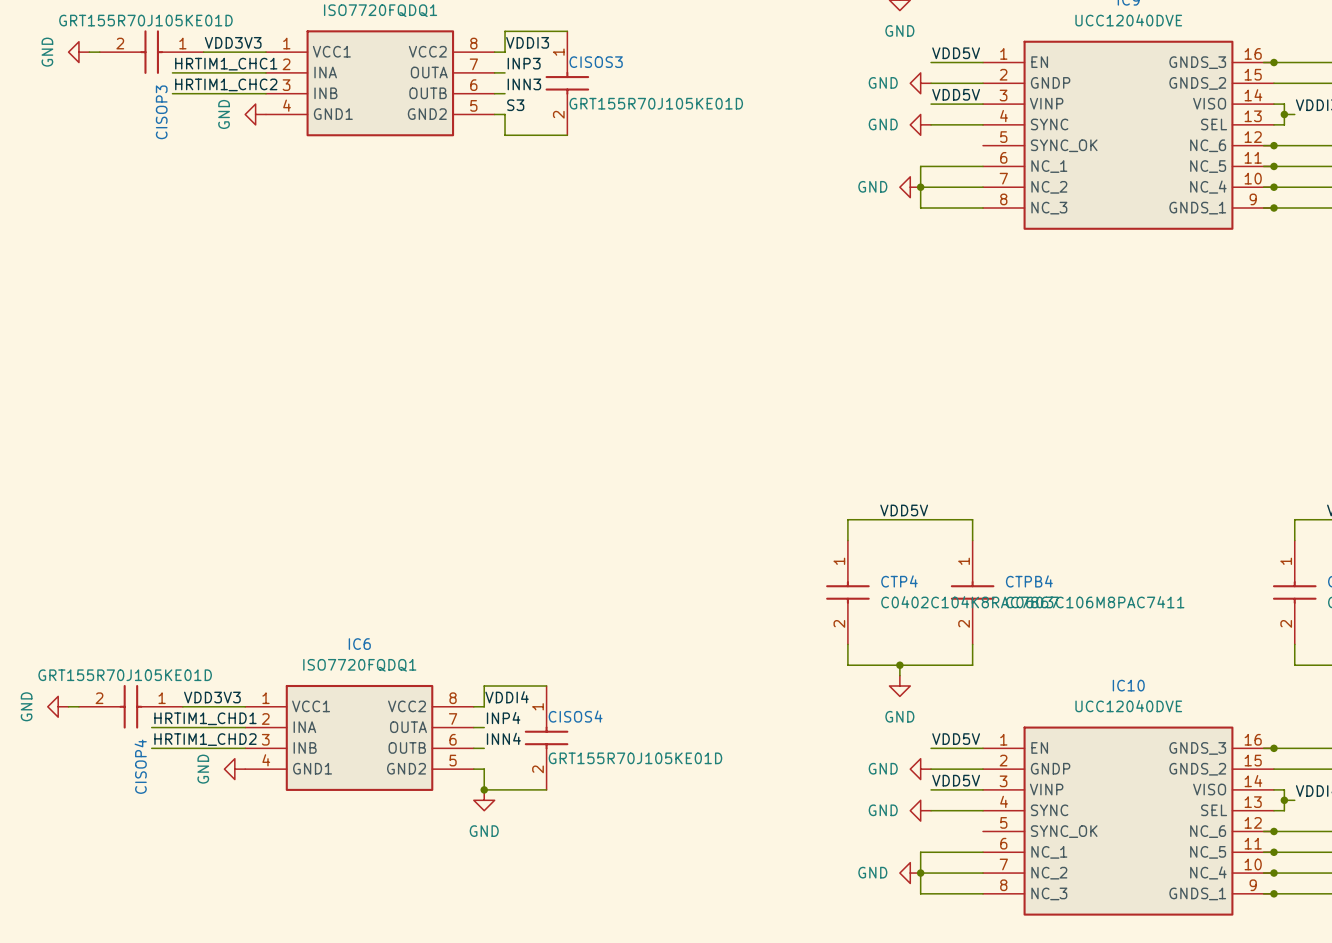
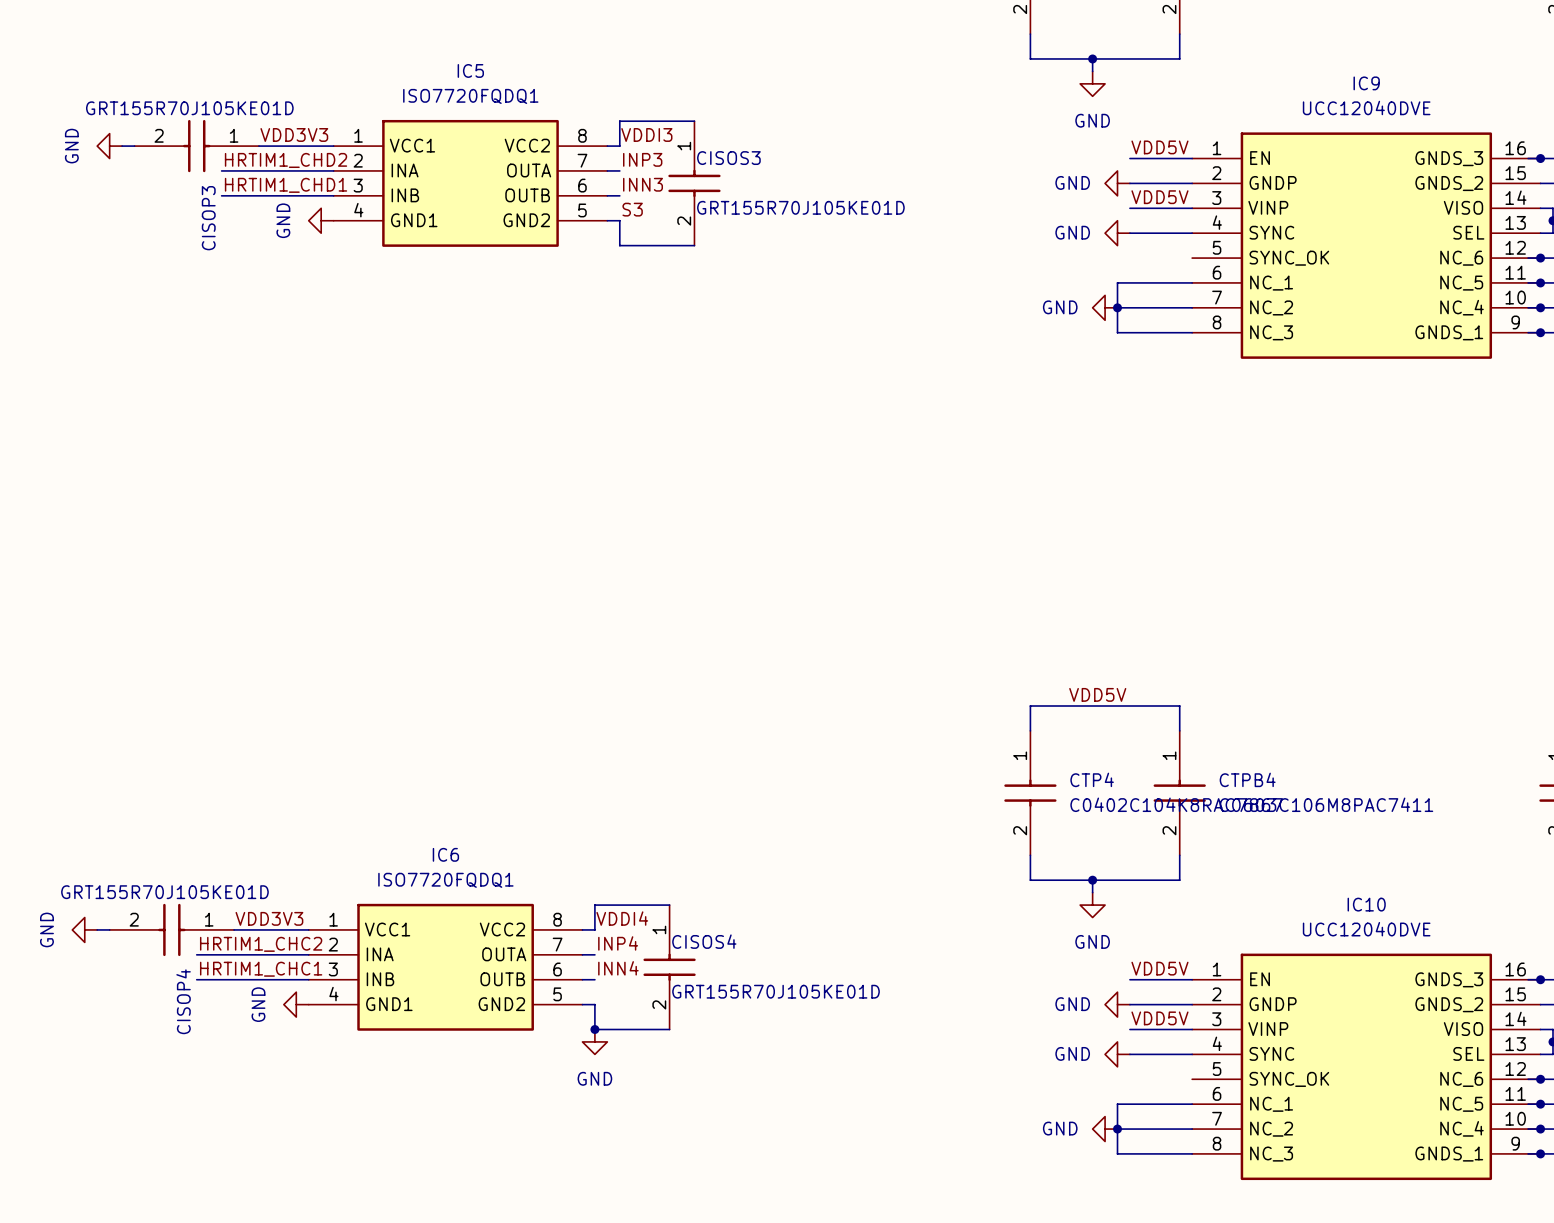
label: HRTIM1_CHC1 (226, 64) -> HRTIM1_CHD2 (286, 160)
label: HRTIM1_CHC2 (226, 84) -> HRTIM1_CHD1 (286, 185)
label: HRTIM1_CHD1 (205, 718) -> HRTIM1_CHC2 (261, 944)
label: HRTIM1_CHD2 (205, 739) -> HRTIM1_CHC1 (261, 969)

